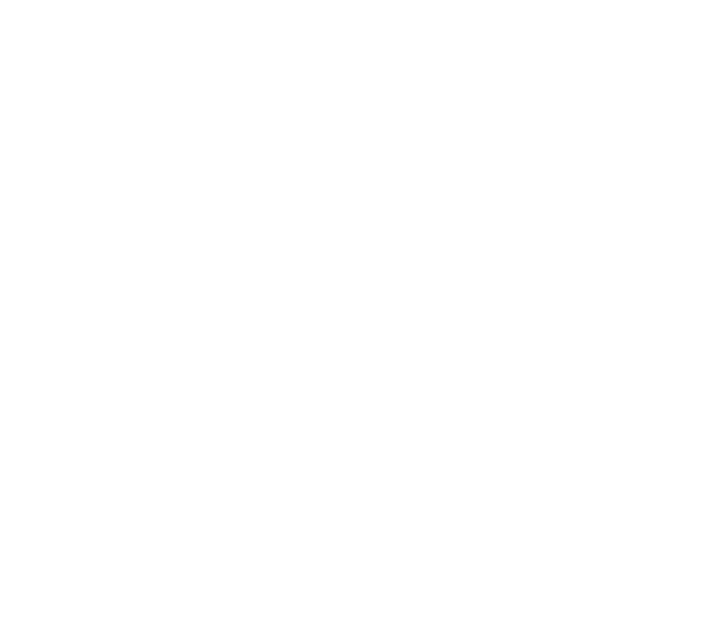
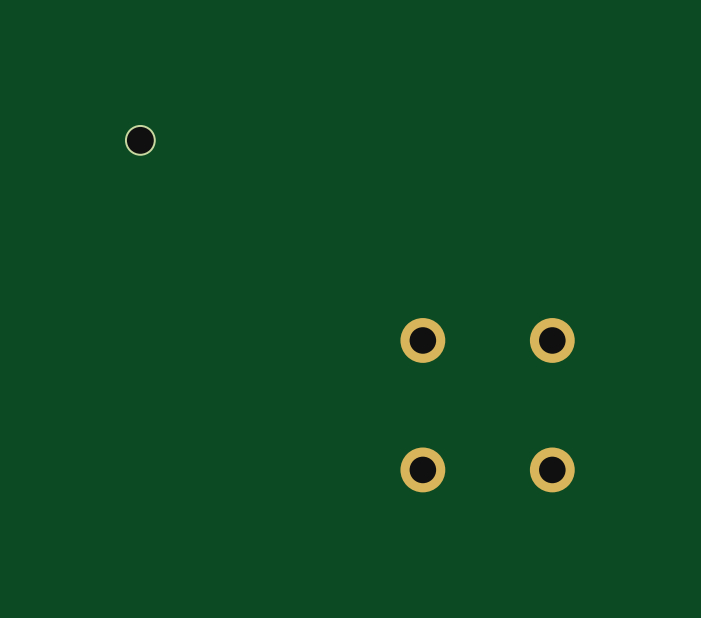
part: none -> (140, 140)
part: none -> (487, 405)

